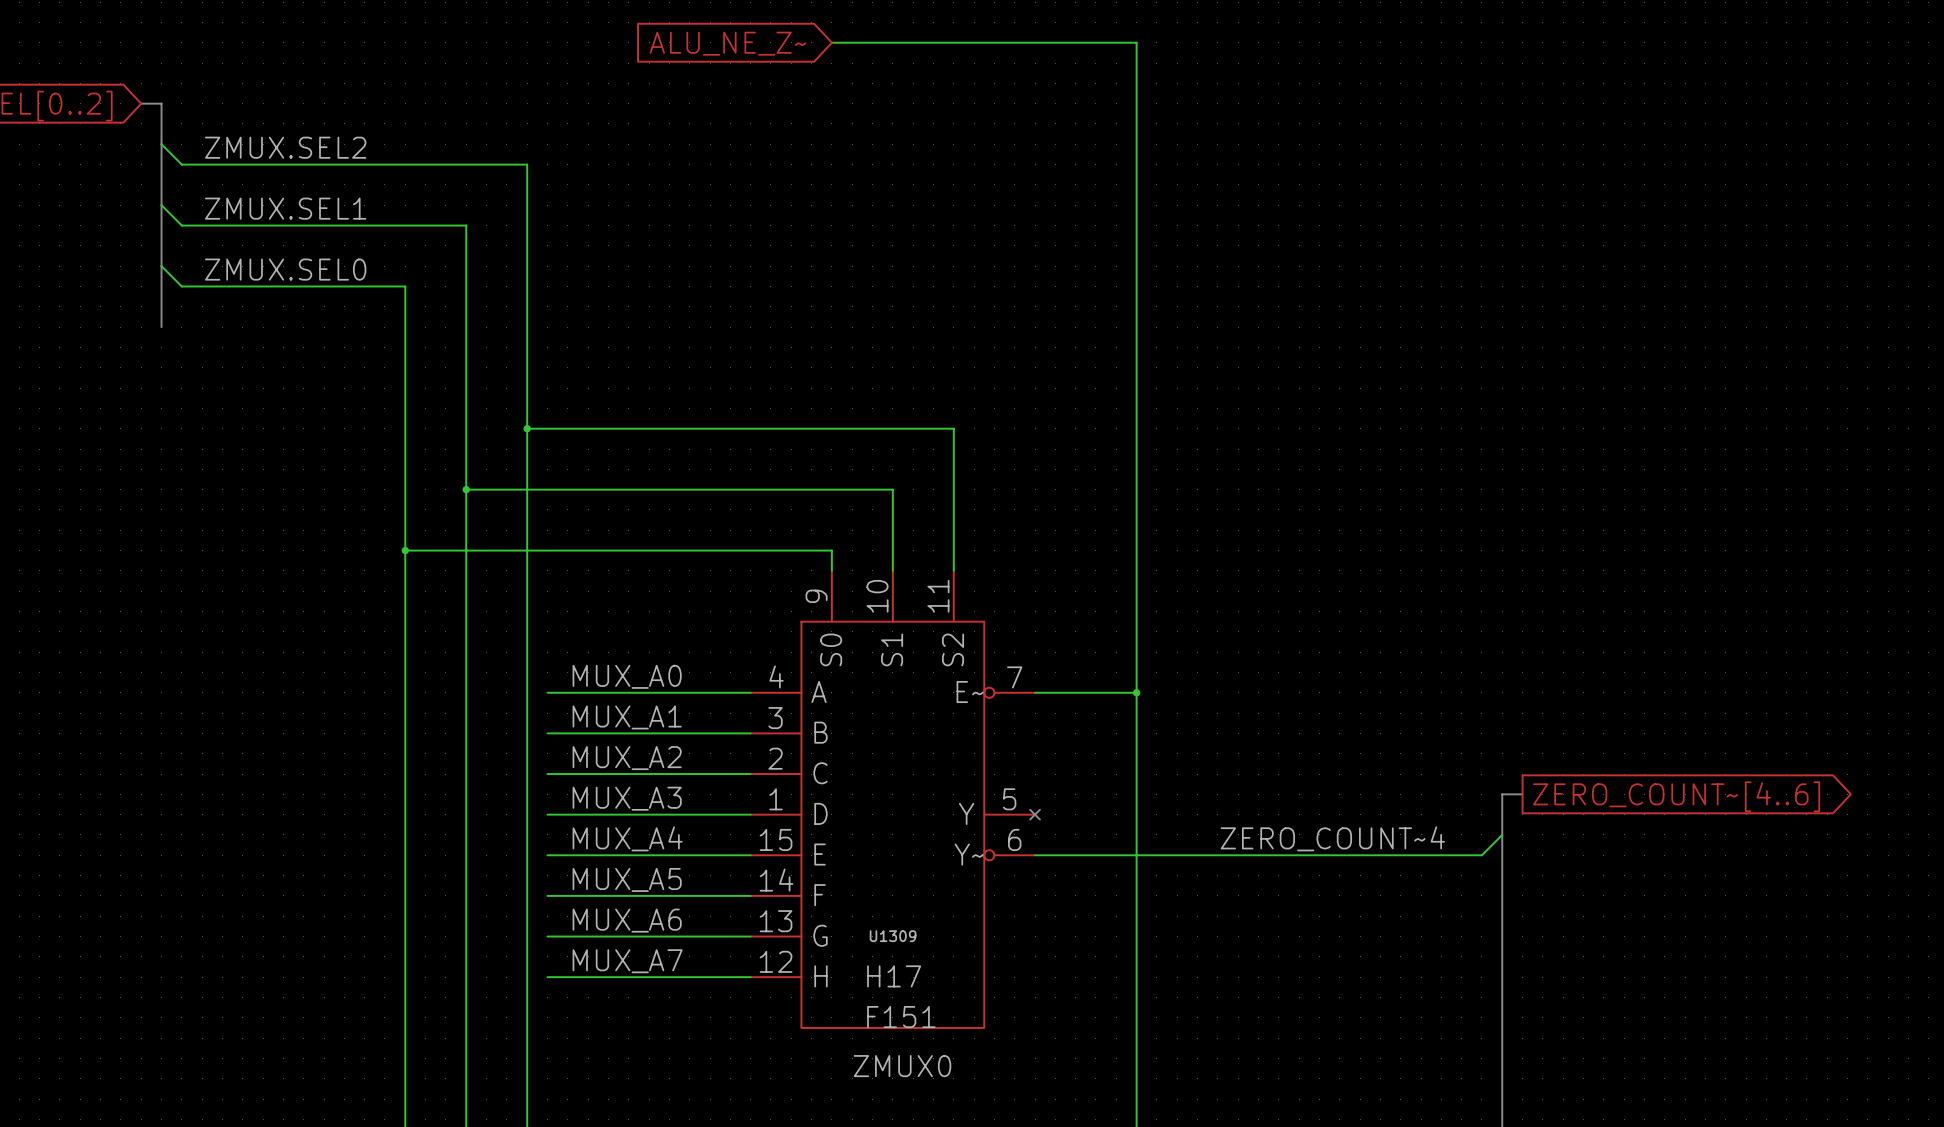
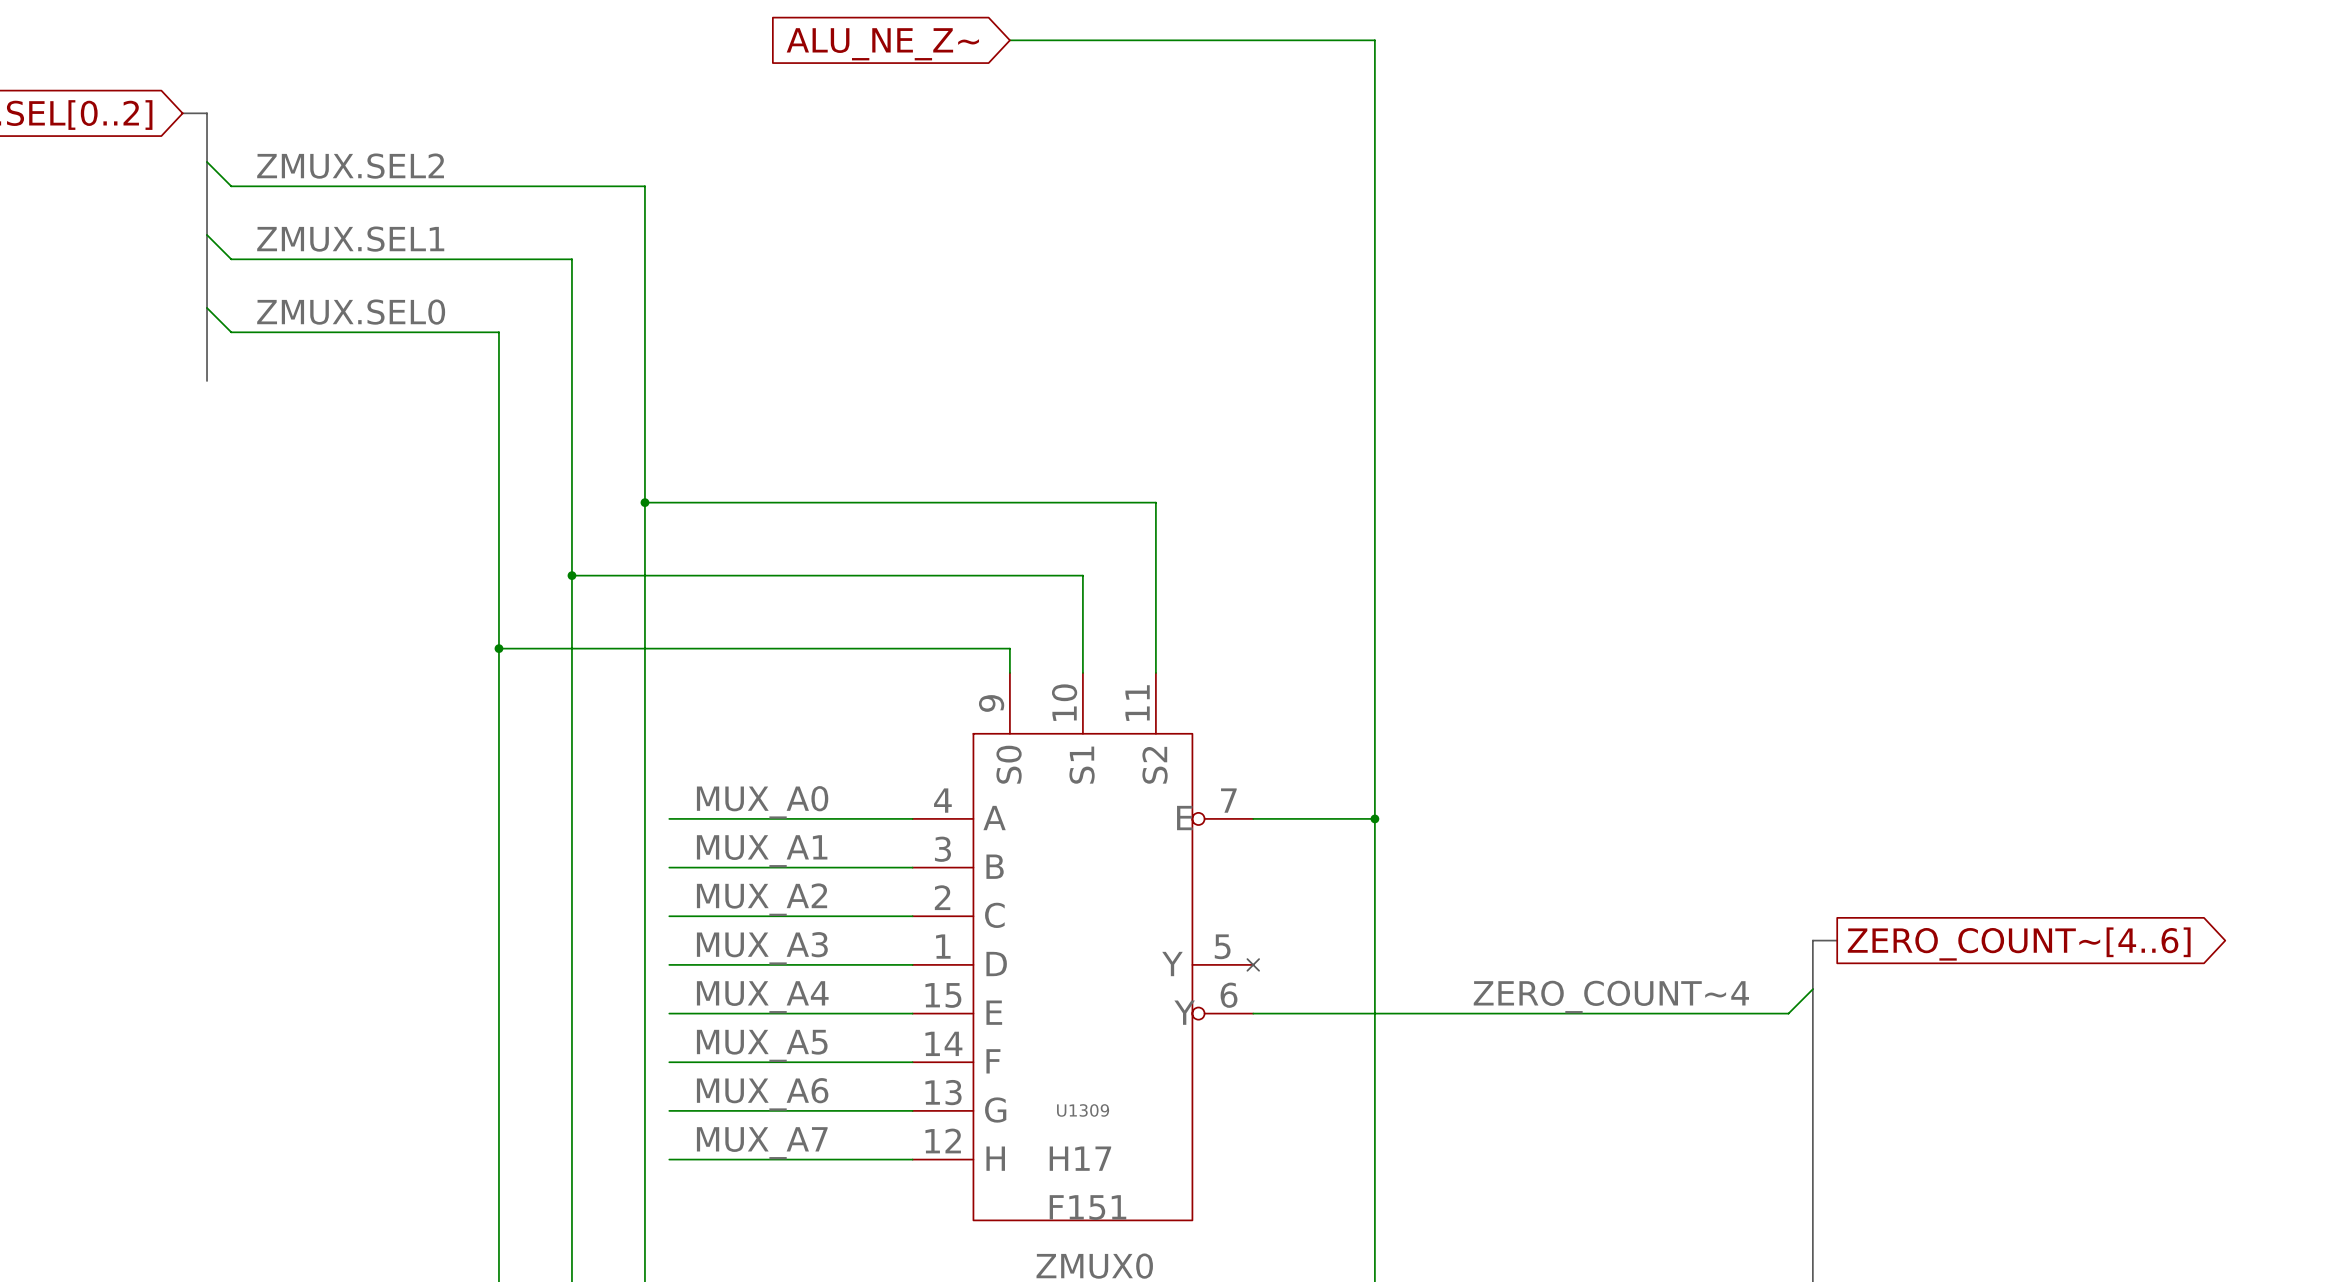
U1309 pin name: E~ (970, 692) -> E (1184, 818)
U1309 pin name: Y~ (969, 854) -> Y (1184, 1012)

